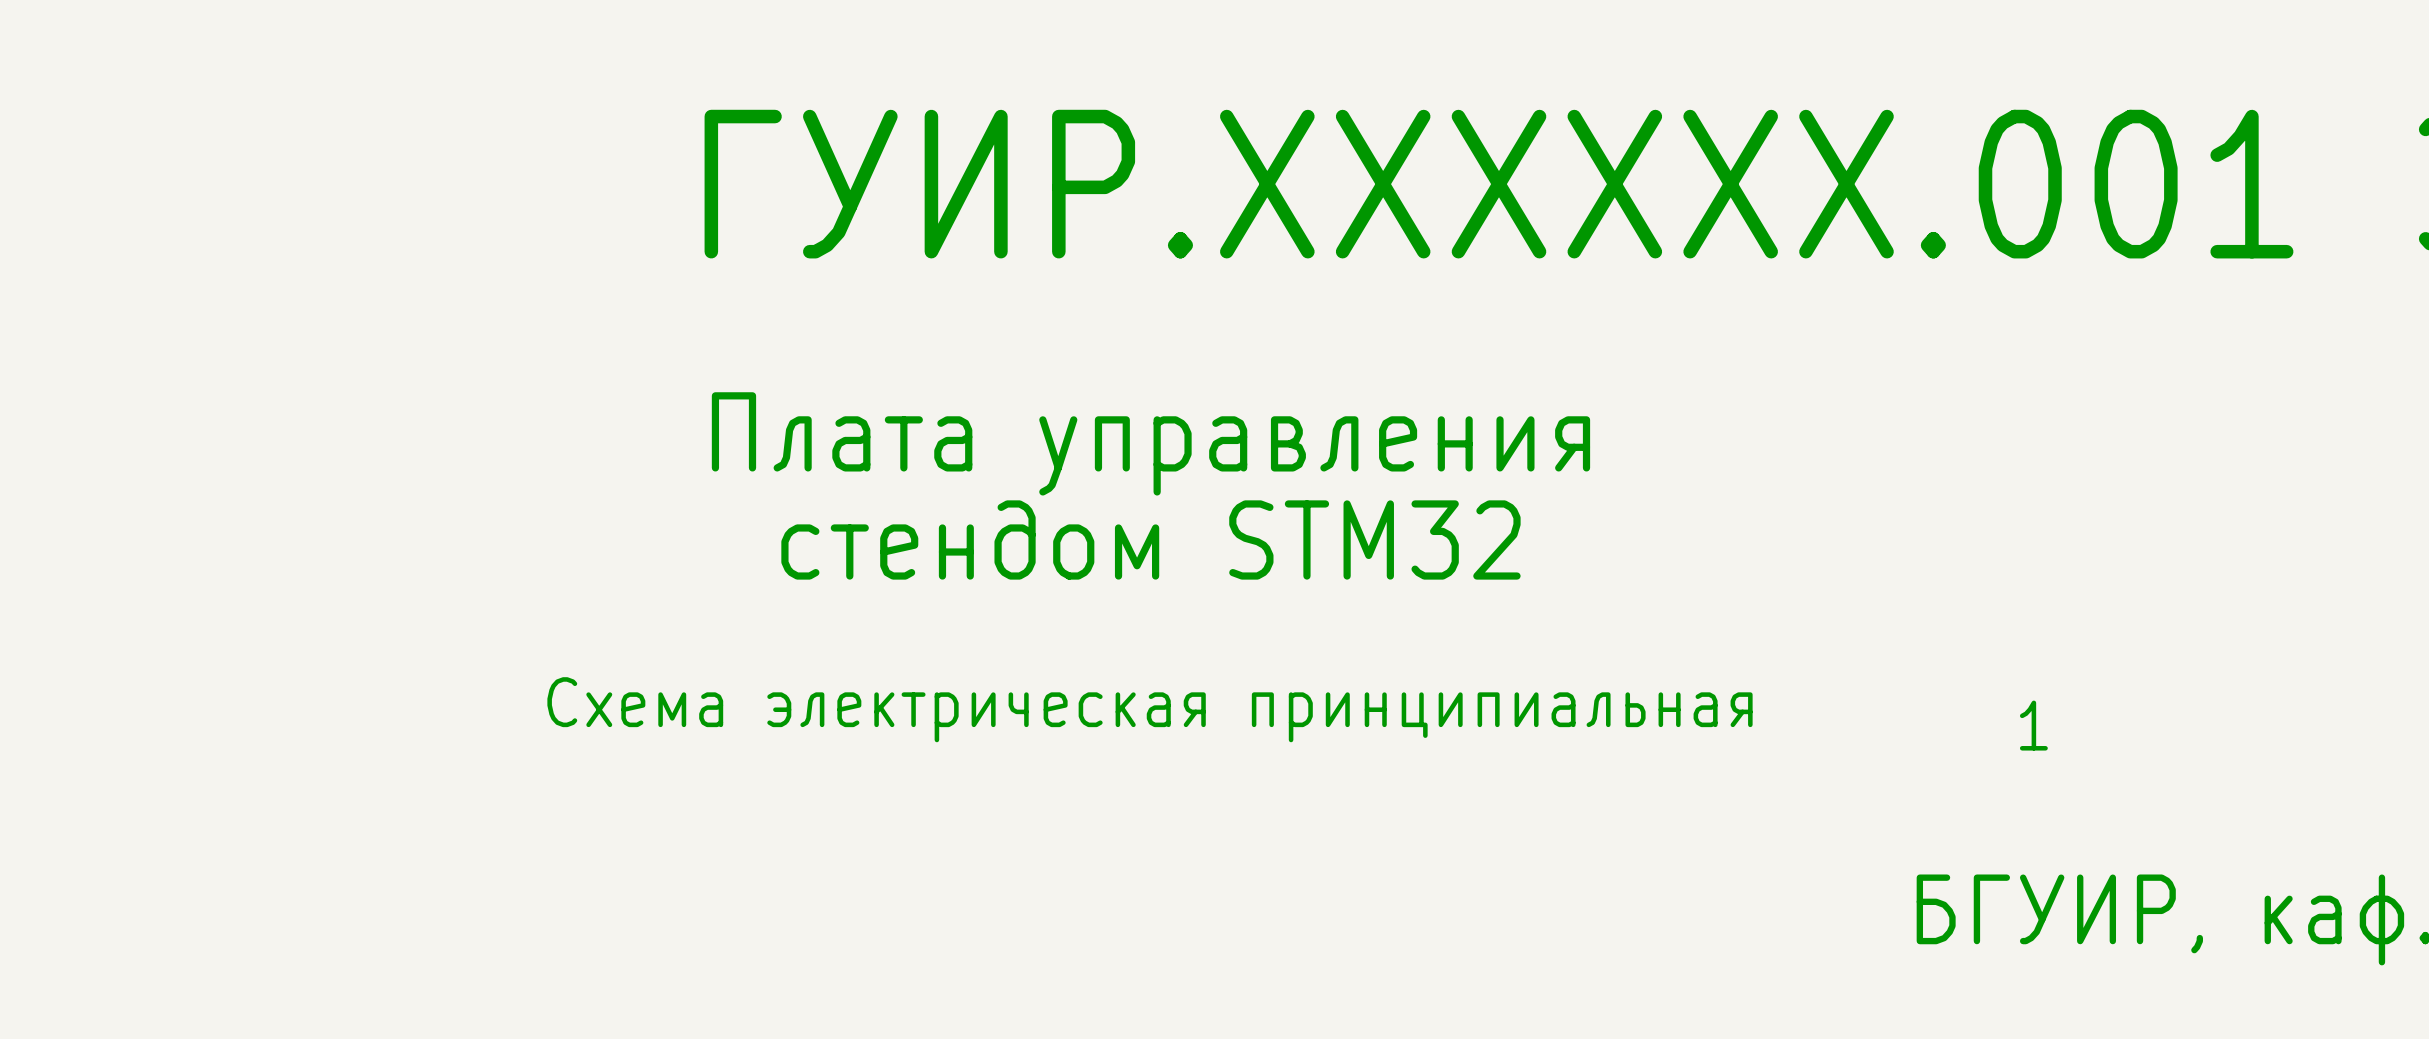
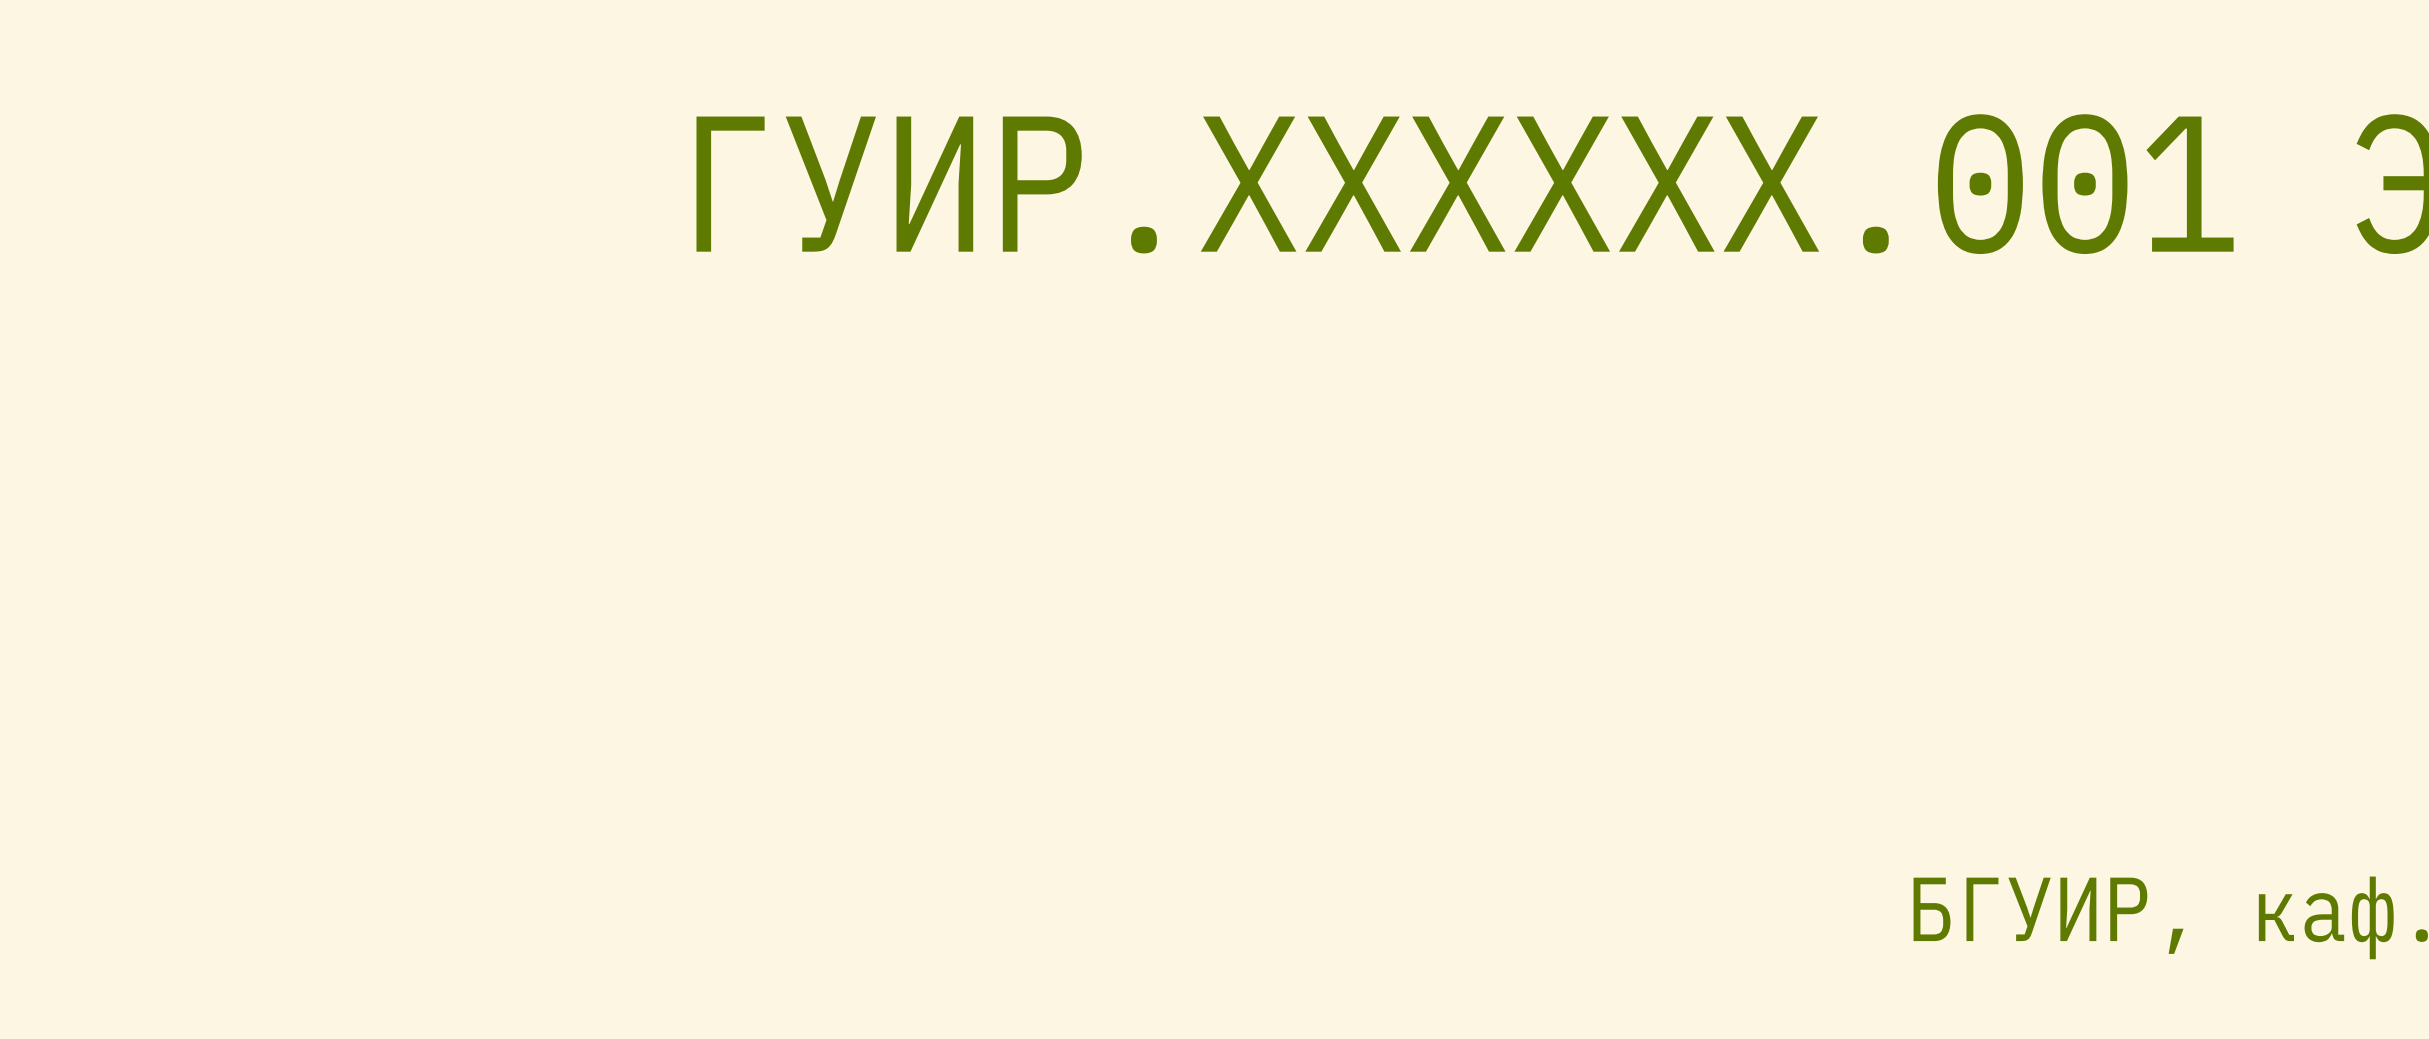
text: Плата управления (1150, 443) -> none
text: стендом STM32 (1150, 539) -> none
text: Схема электрическая принципиальная (1150, 709) -> none
text: 1 (2033, 725) -> none

